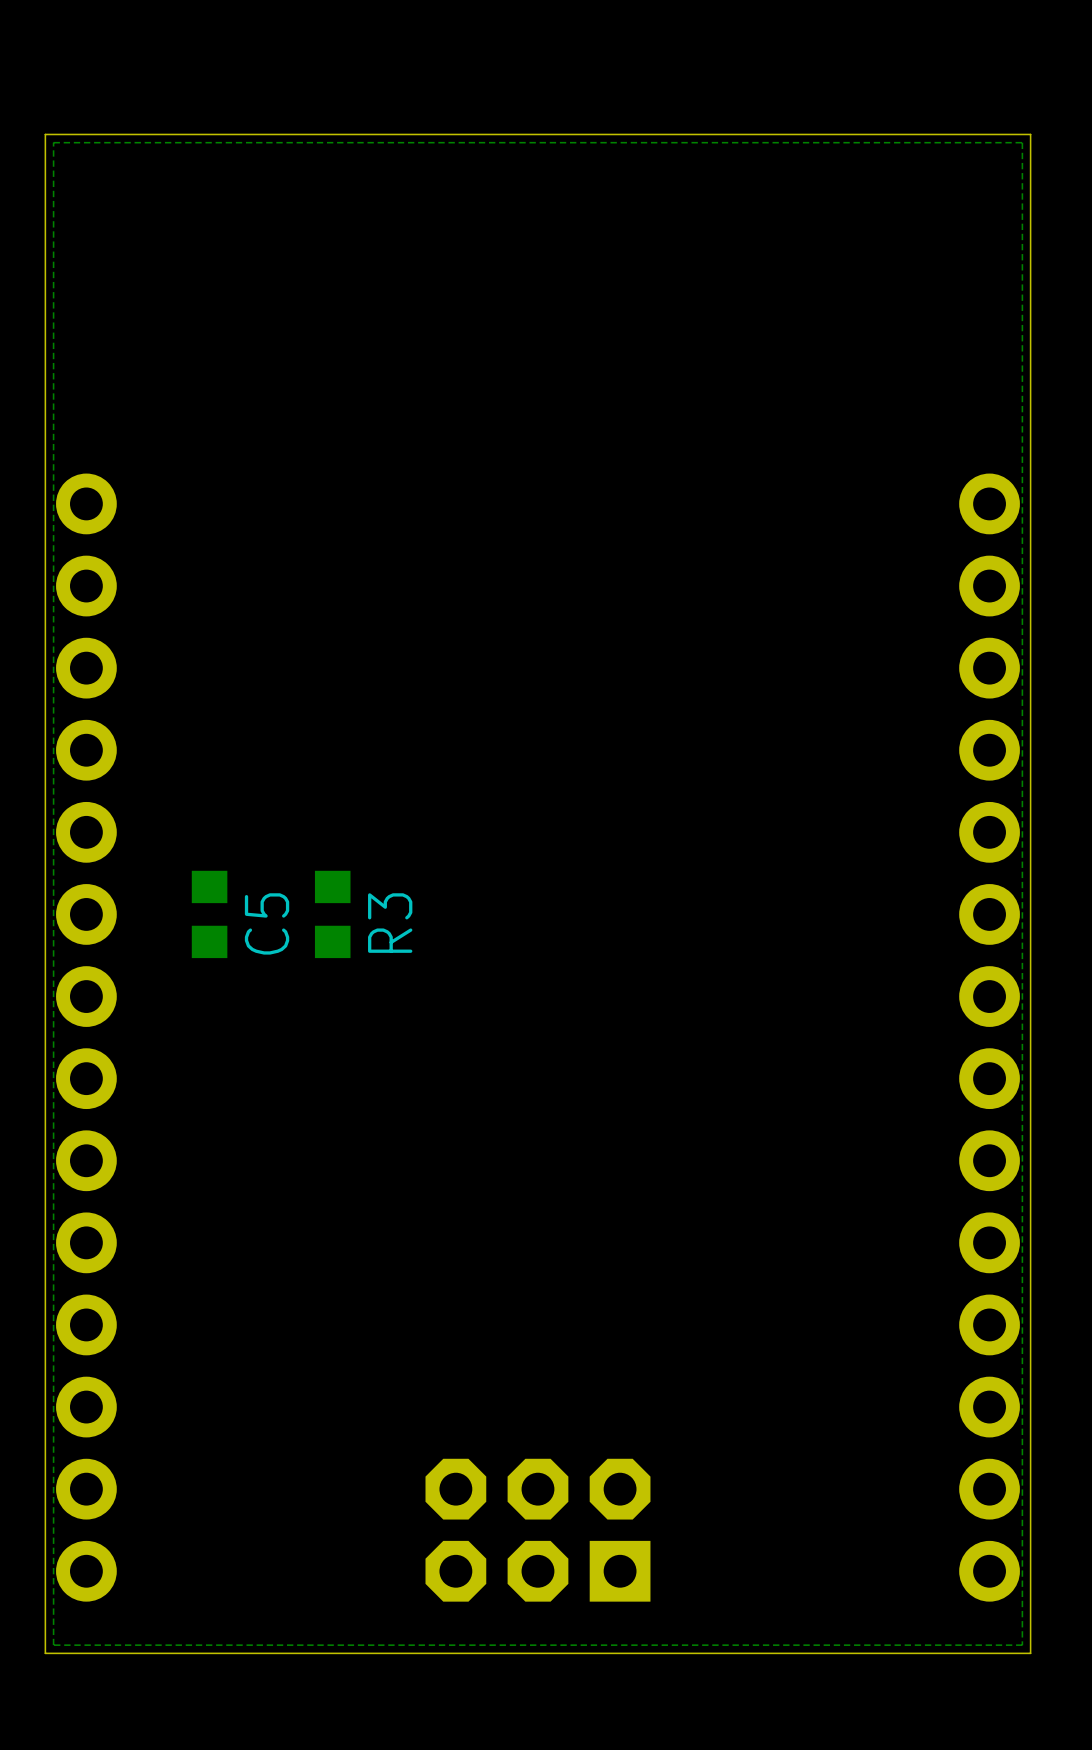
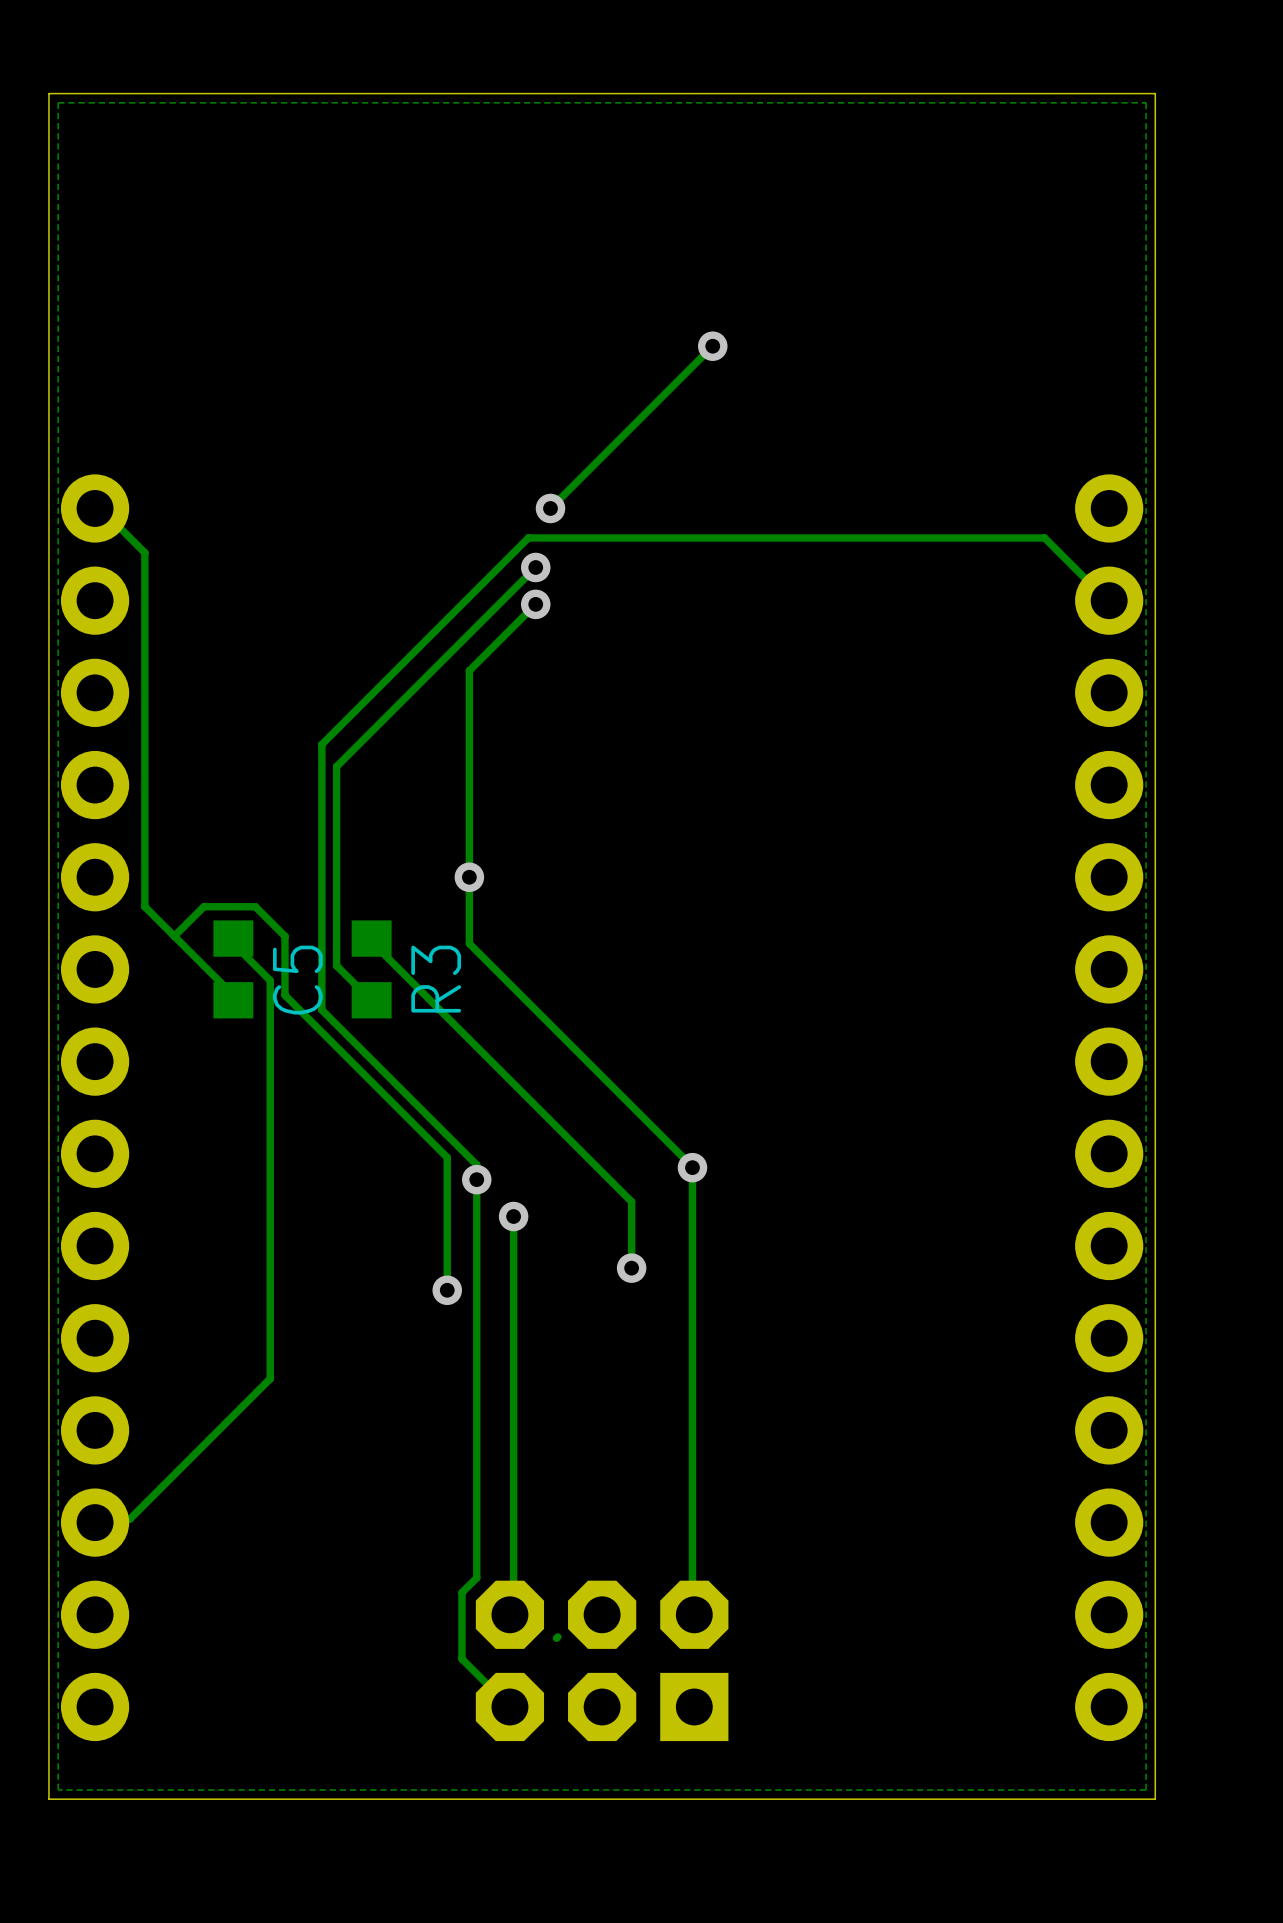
track: none -> (712, 346) (550, 508)
via: none -> (712, 346)
track: none -> (95, 508) (100, 508) (144, 552) (144, 906) (233, 995) (233, 1000)
via: none -> (550, 508)
track: none -> (535, 567) (336, 766) (336, 965) (371, 1000)
via: none -> (535, 567)
track: none -> (1109, 600) (1044, 537) (528, 537) (321, 744) (321, 1010) (476, 1164) (476, 1577) (461, 1592) (461, 1659) (509, 1706)
track: none -> (535, 604) (469, 670) (469, 943) (692, 1167) (692, 1612) (694, 1614)
via: none -> (535, 604)
via: none -> (469, 877)
track: none -> (174, 936) (203, 906) (255, 906) (284, 936) (284, 995) (447, 1157) (447, 1290)
track: none -> (233, 938) (233, 943) (270, 980) (270, 1378) (130, 1518) (100, 1518) (95, 1522)
track: none -> (371, 938) (373, 943) (631, 1201) (631, 1268)
via: none -> (692, 1167)
via: none -> (476, 1179)
track: none -> (513, 1216) (513, 1614) (509, 1614)
via: none -> (513, 1216)
via: none -> (631, 1268)
via: none -> (447, 1290)
track: none -> (557, 1636) (556, 1638)

